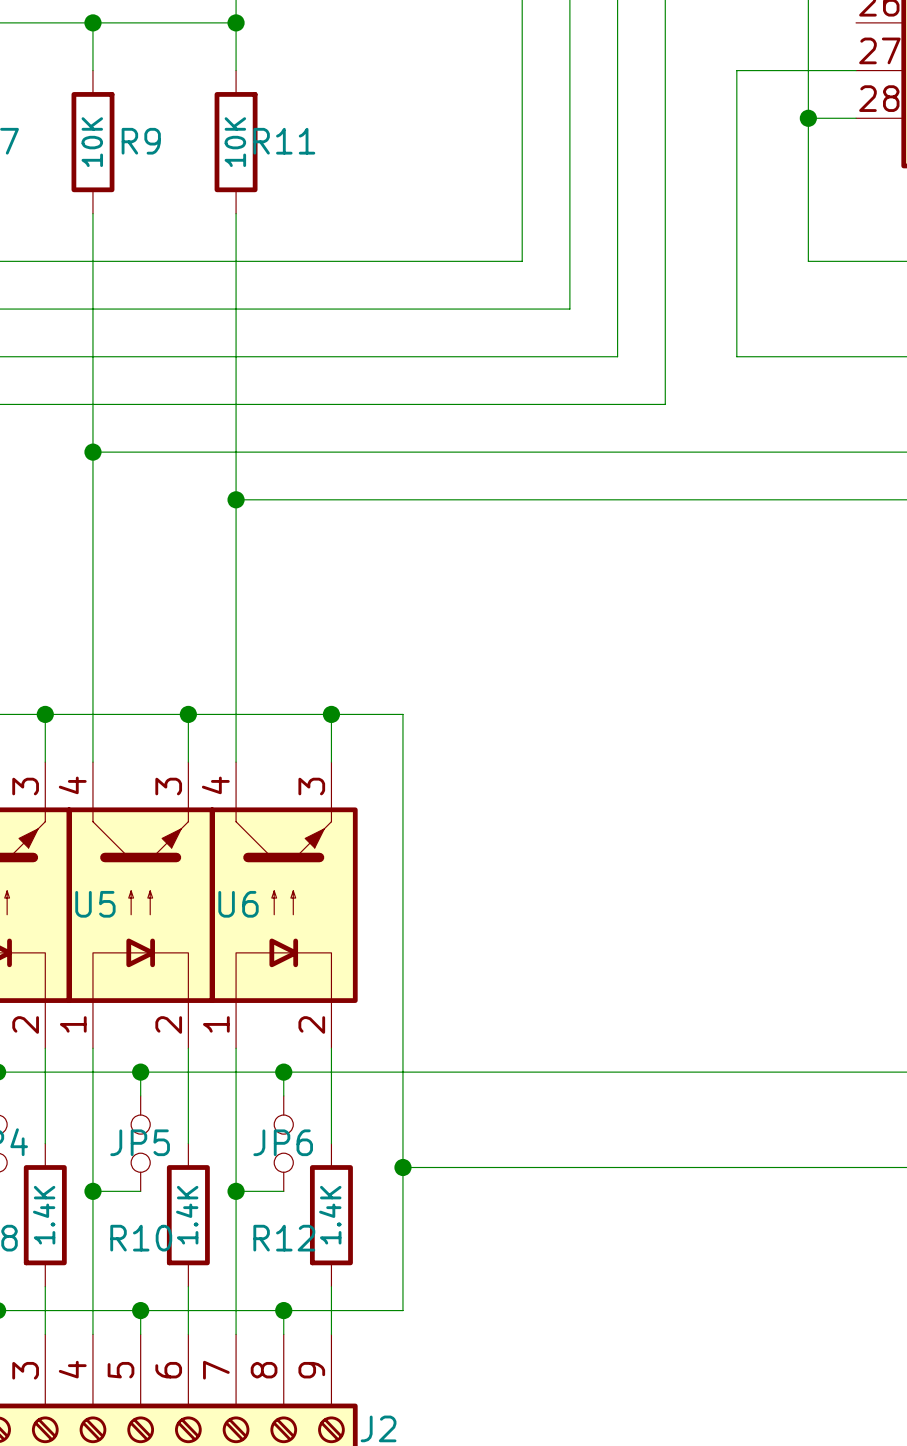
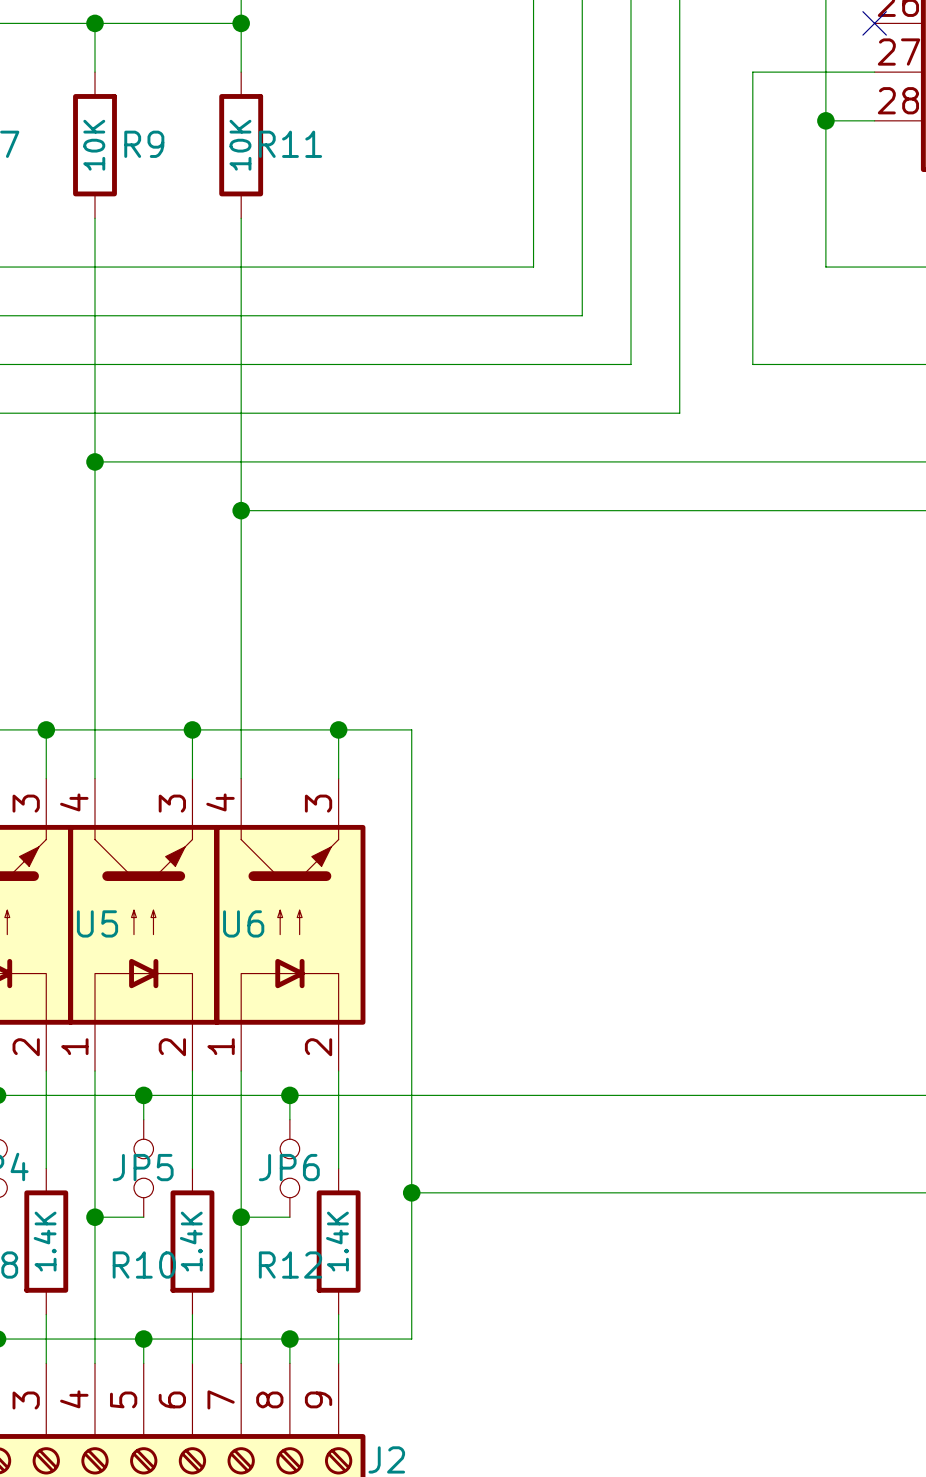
no-connect mark: none -> (874, 23)

